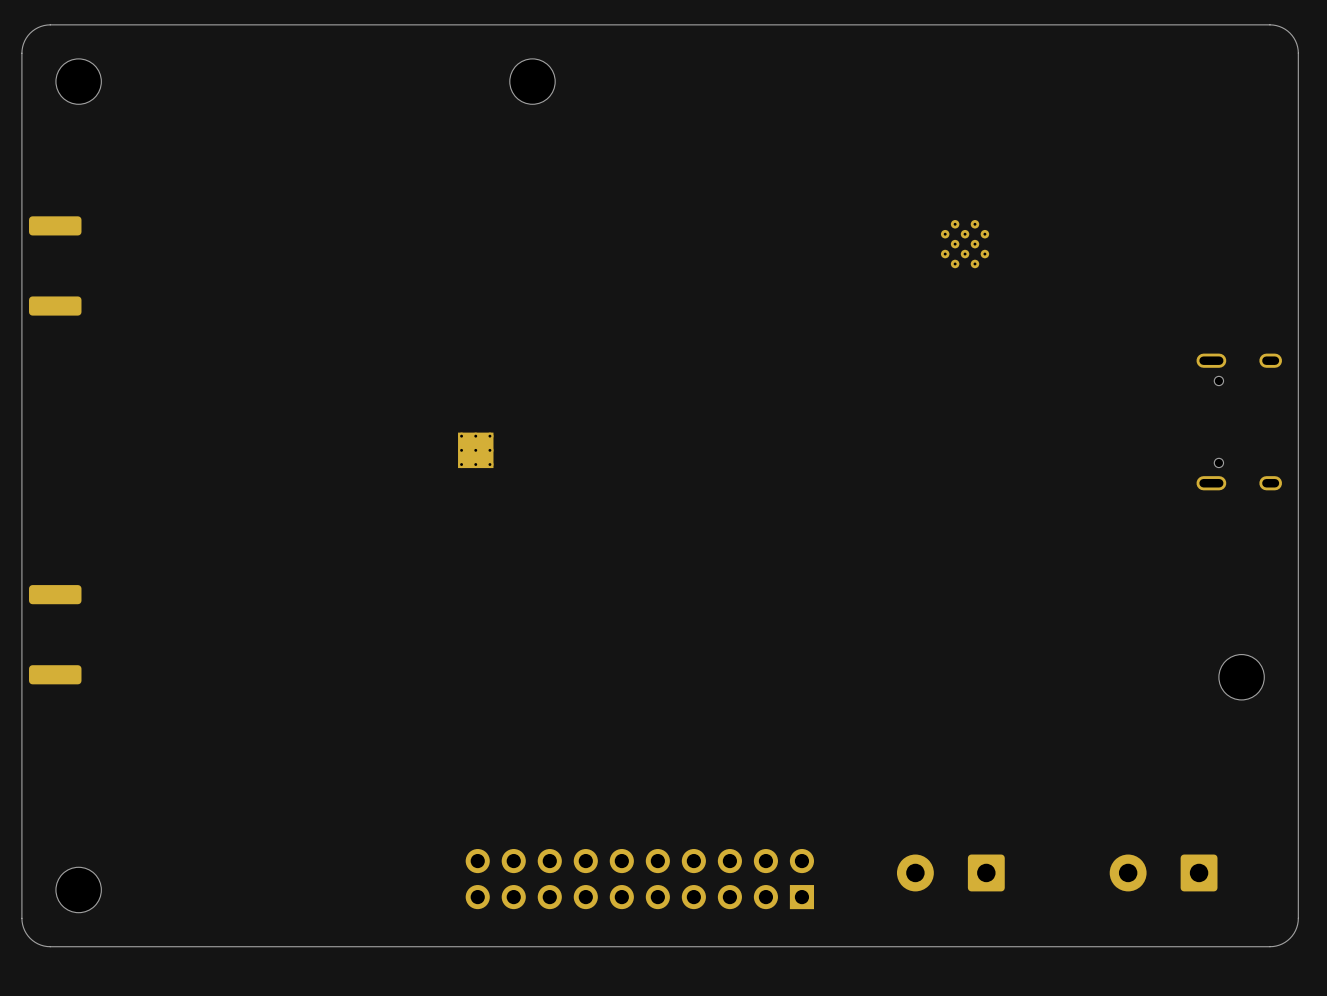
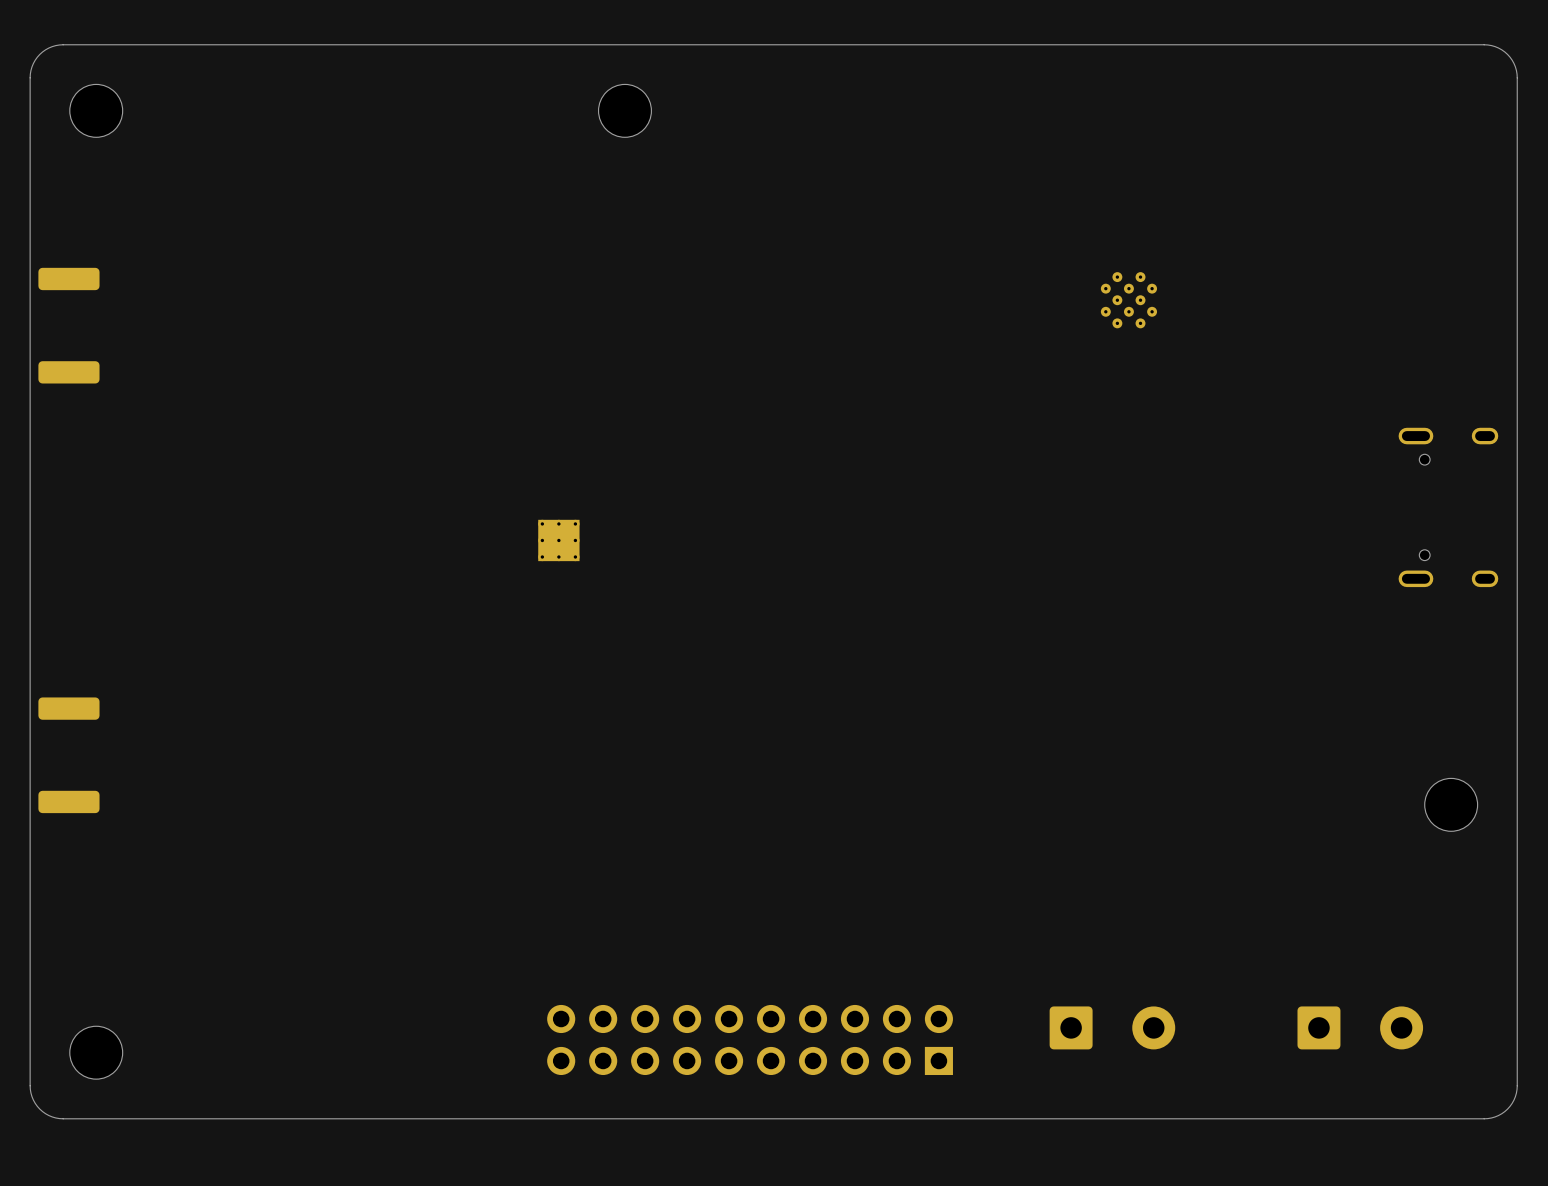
part rotation: 0° (950, 872) -> 180° (1112, 1027)
part rotation: 0° (1163, 872) -> 180° (1360, 1027)

